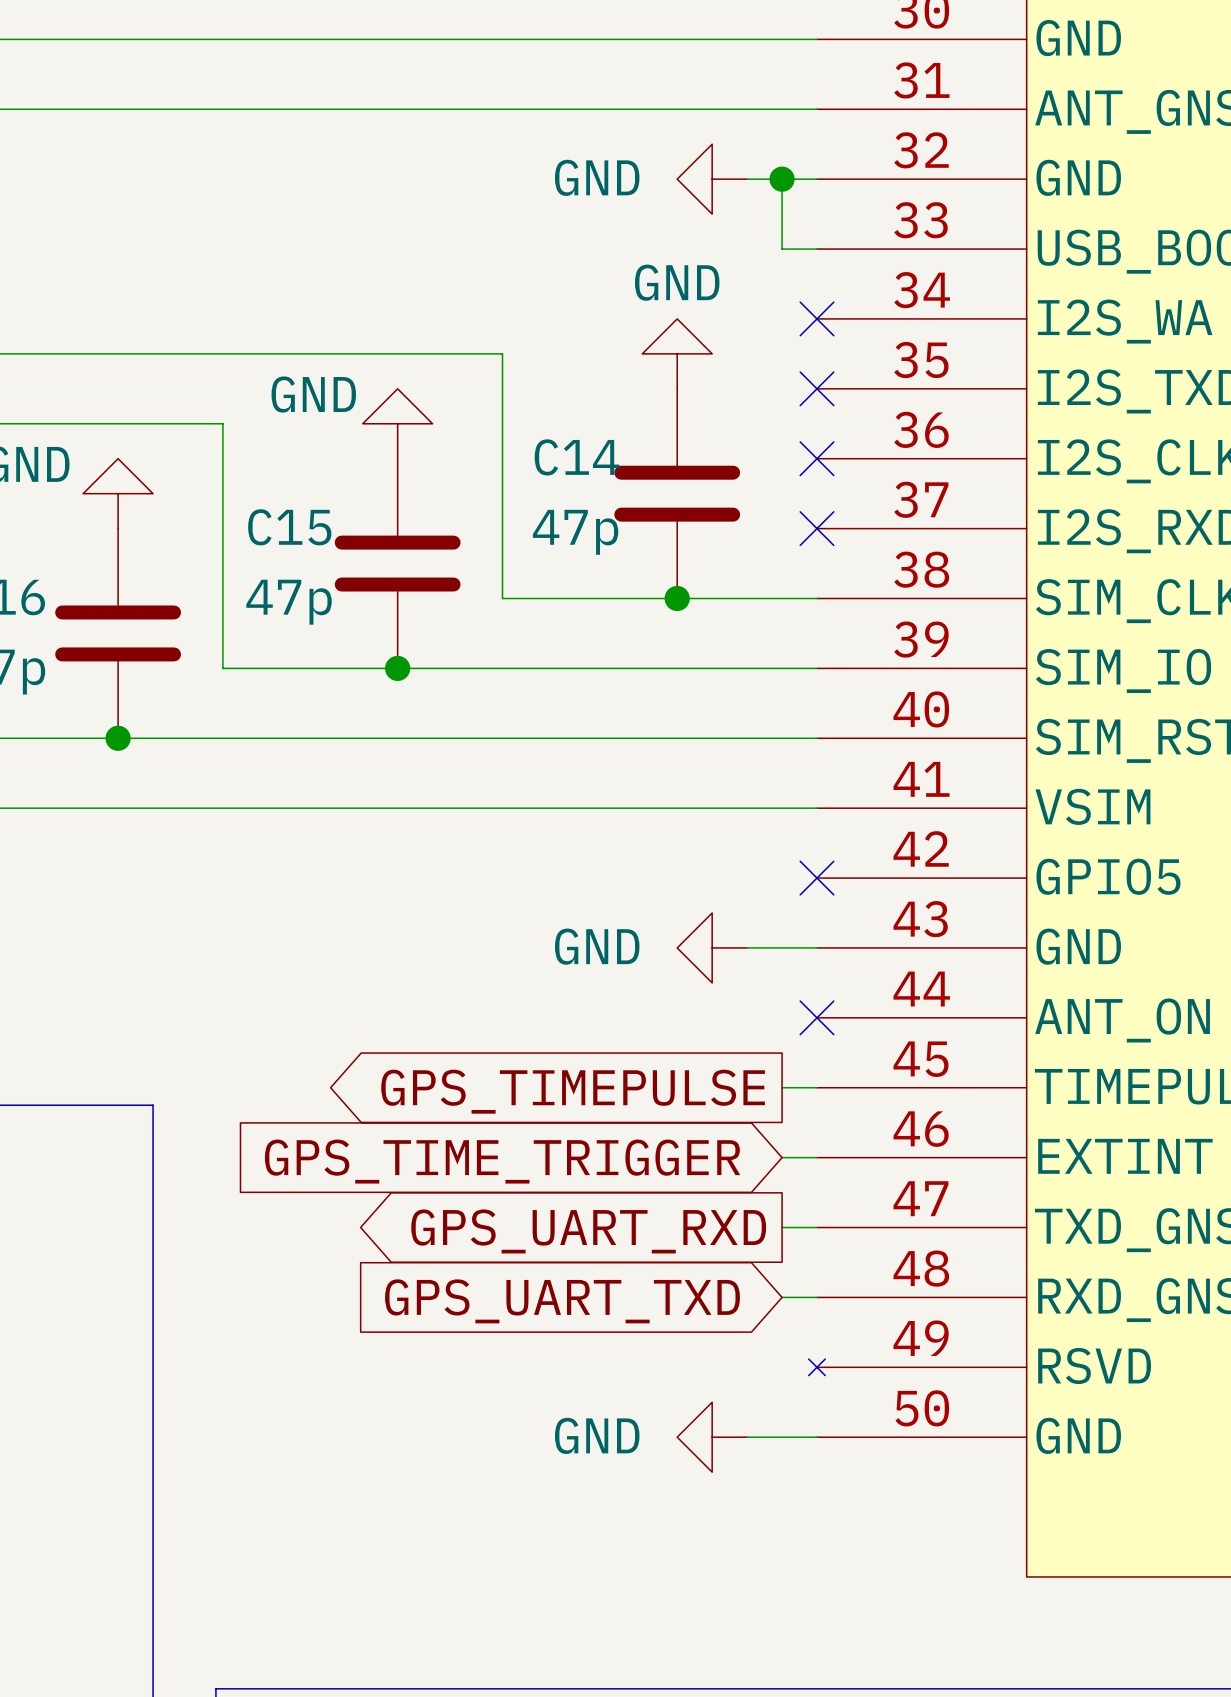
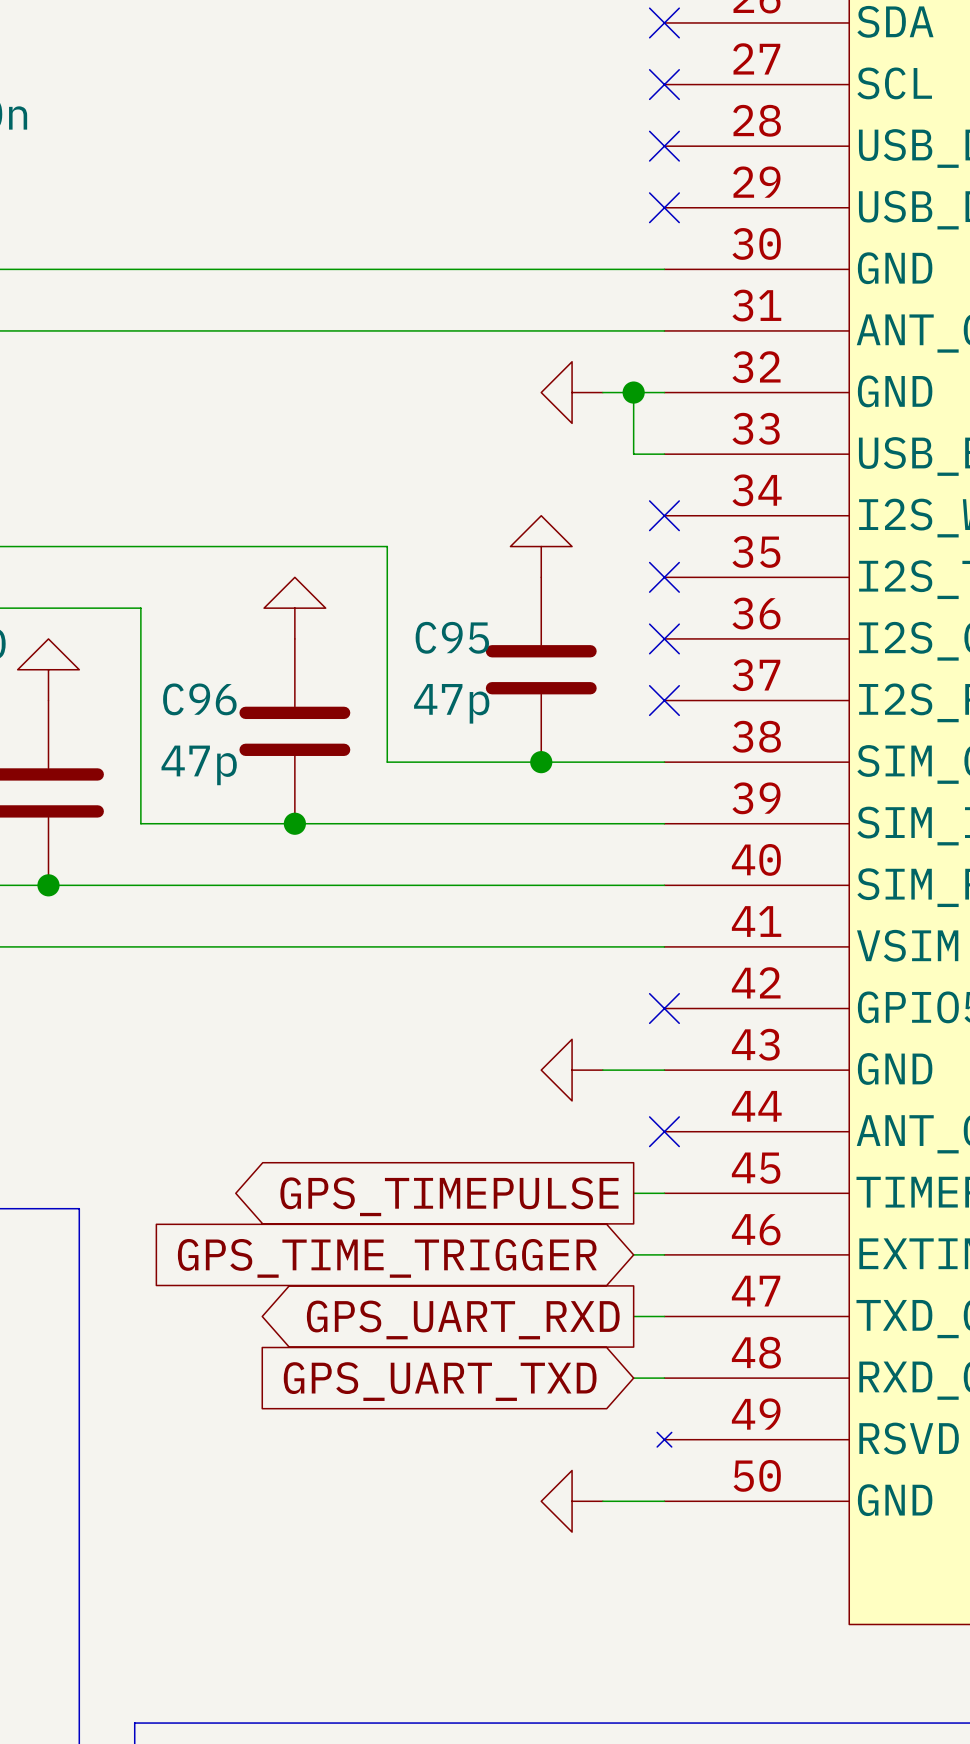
power symbol text: GND (597, 177) -> none
power symbol text: GND (677, 282) -> none
power symbol text: GND (313, 394) -> none
C14 name: C14 (577, 457) -> C95 (452, 637)
C15 name: C15 (289, 527) -> C96 (199, 699)
power symbol text: GND (597, 946) -> none
power symbol text: GND (597, 1435) -> none

